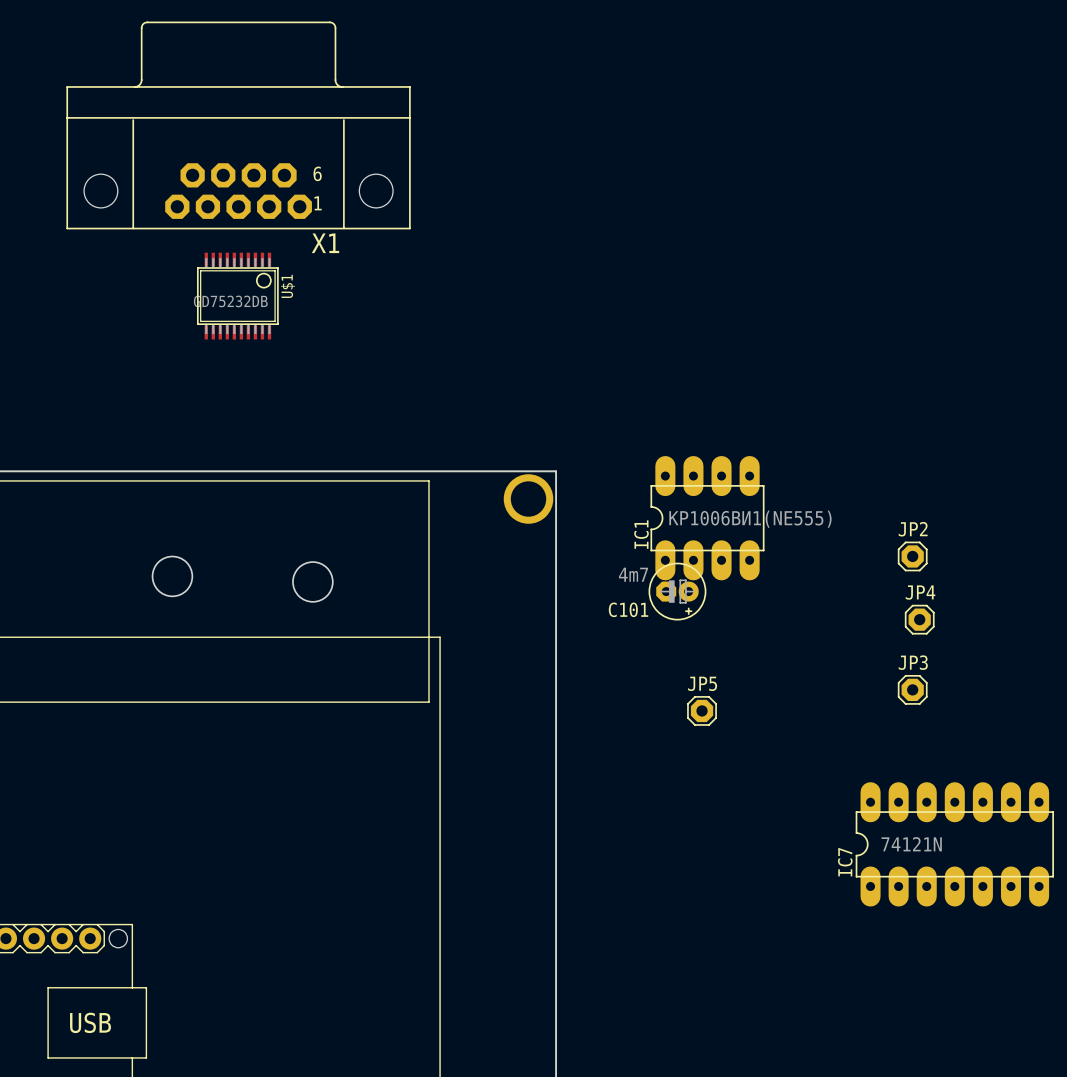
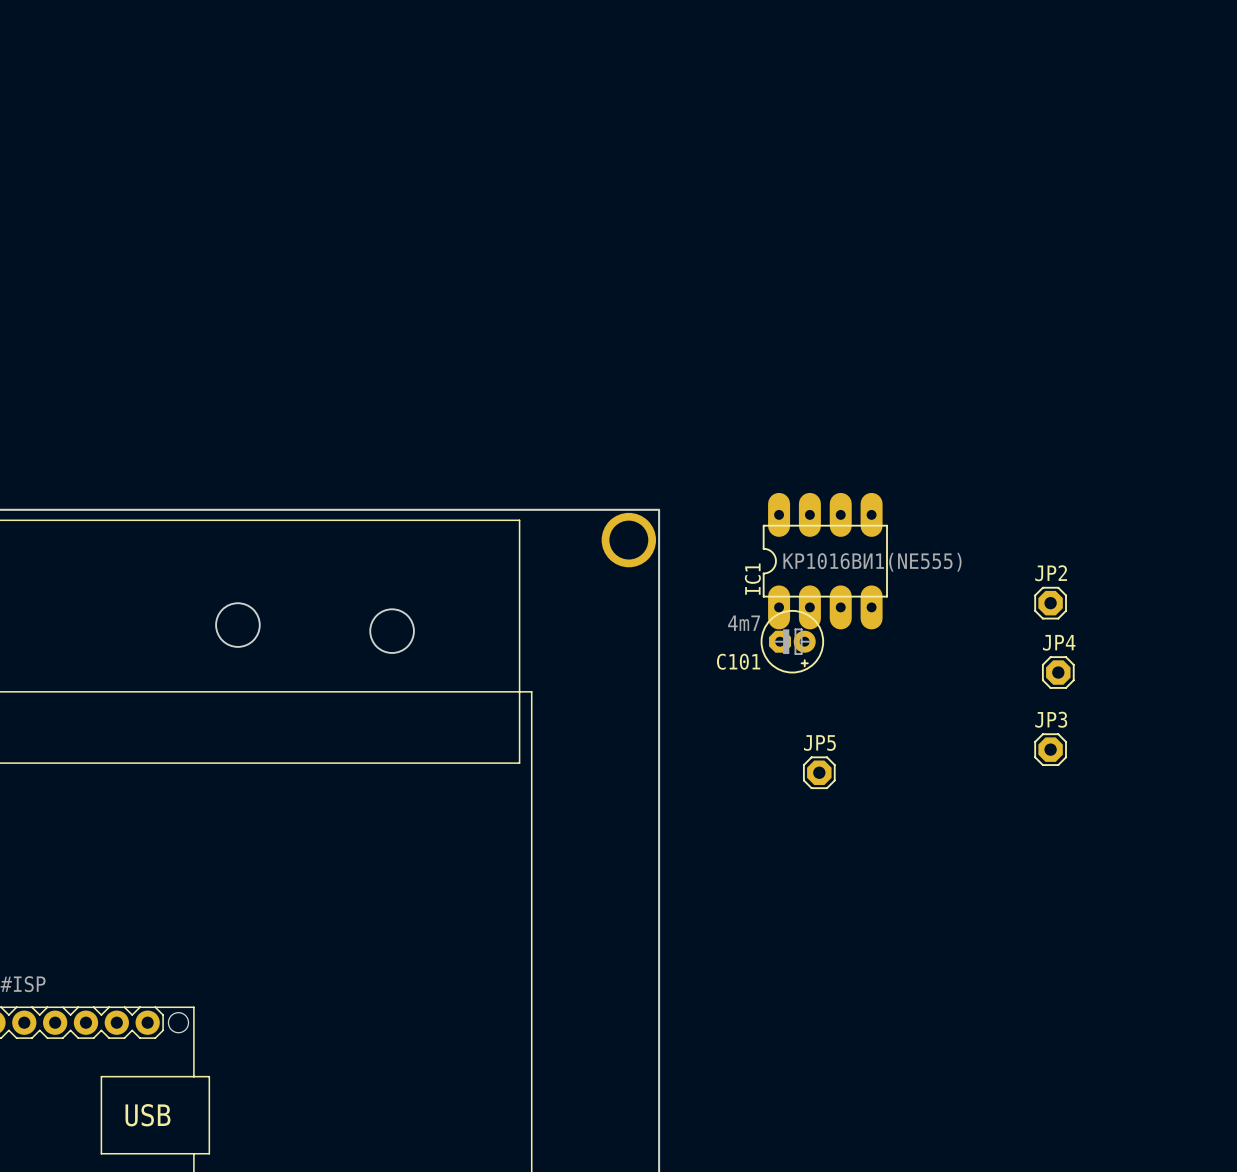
X1: (238, 125) -> none
U$1: GD75232DB (237, 296) -> none
IC1 value: КР1006ВИ1(NE555) (750, 519) -> КР1016ВИ1(NE555) (872, 562)
IC7: 74121N (954, 844) -> none

